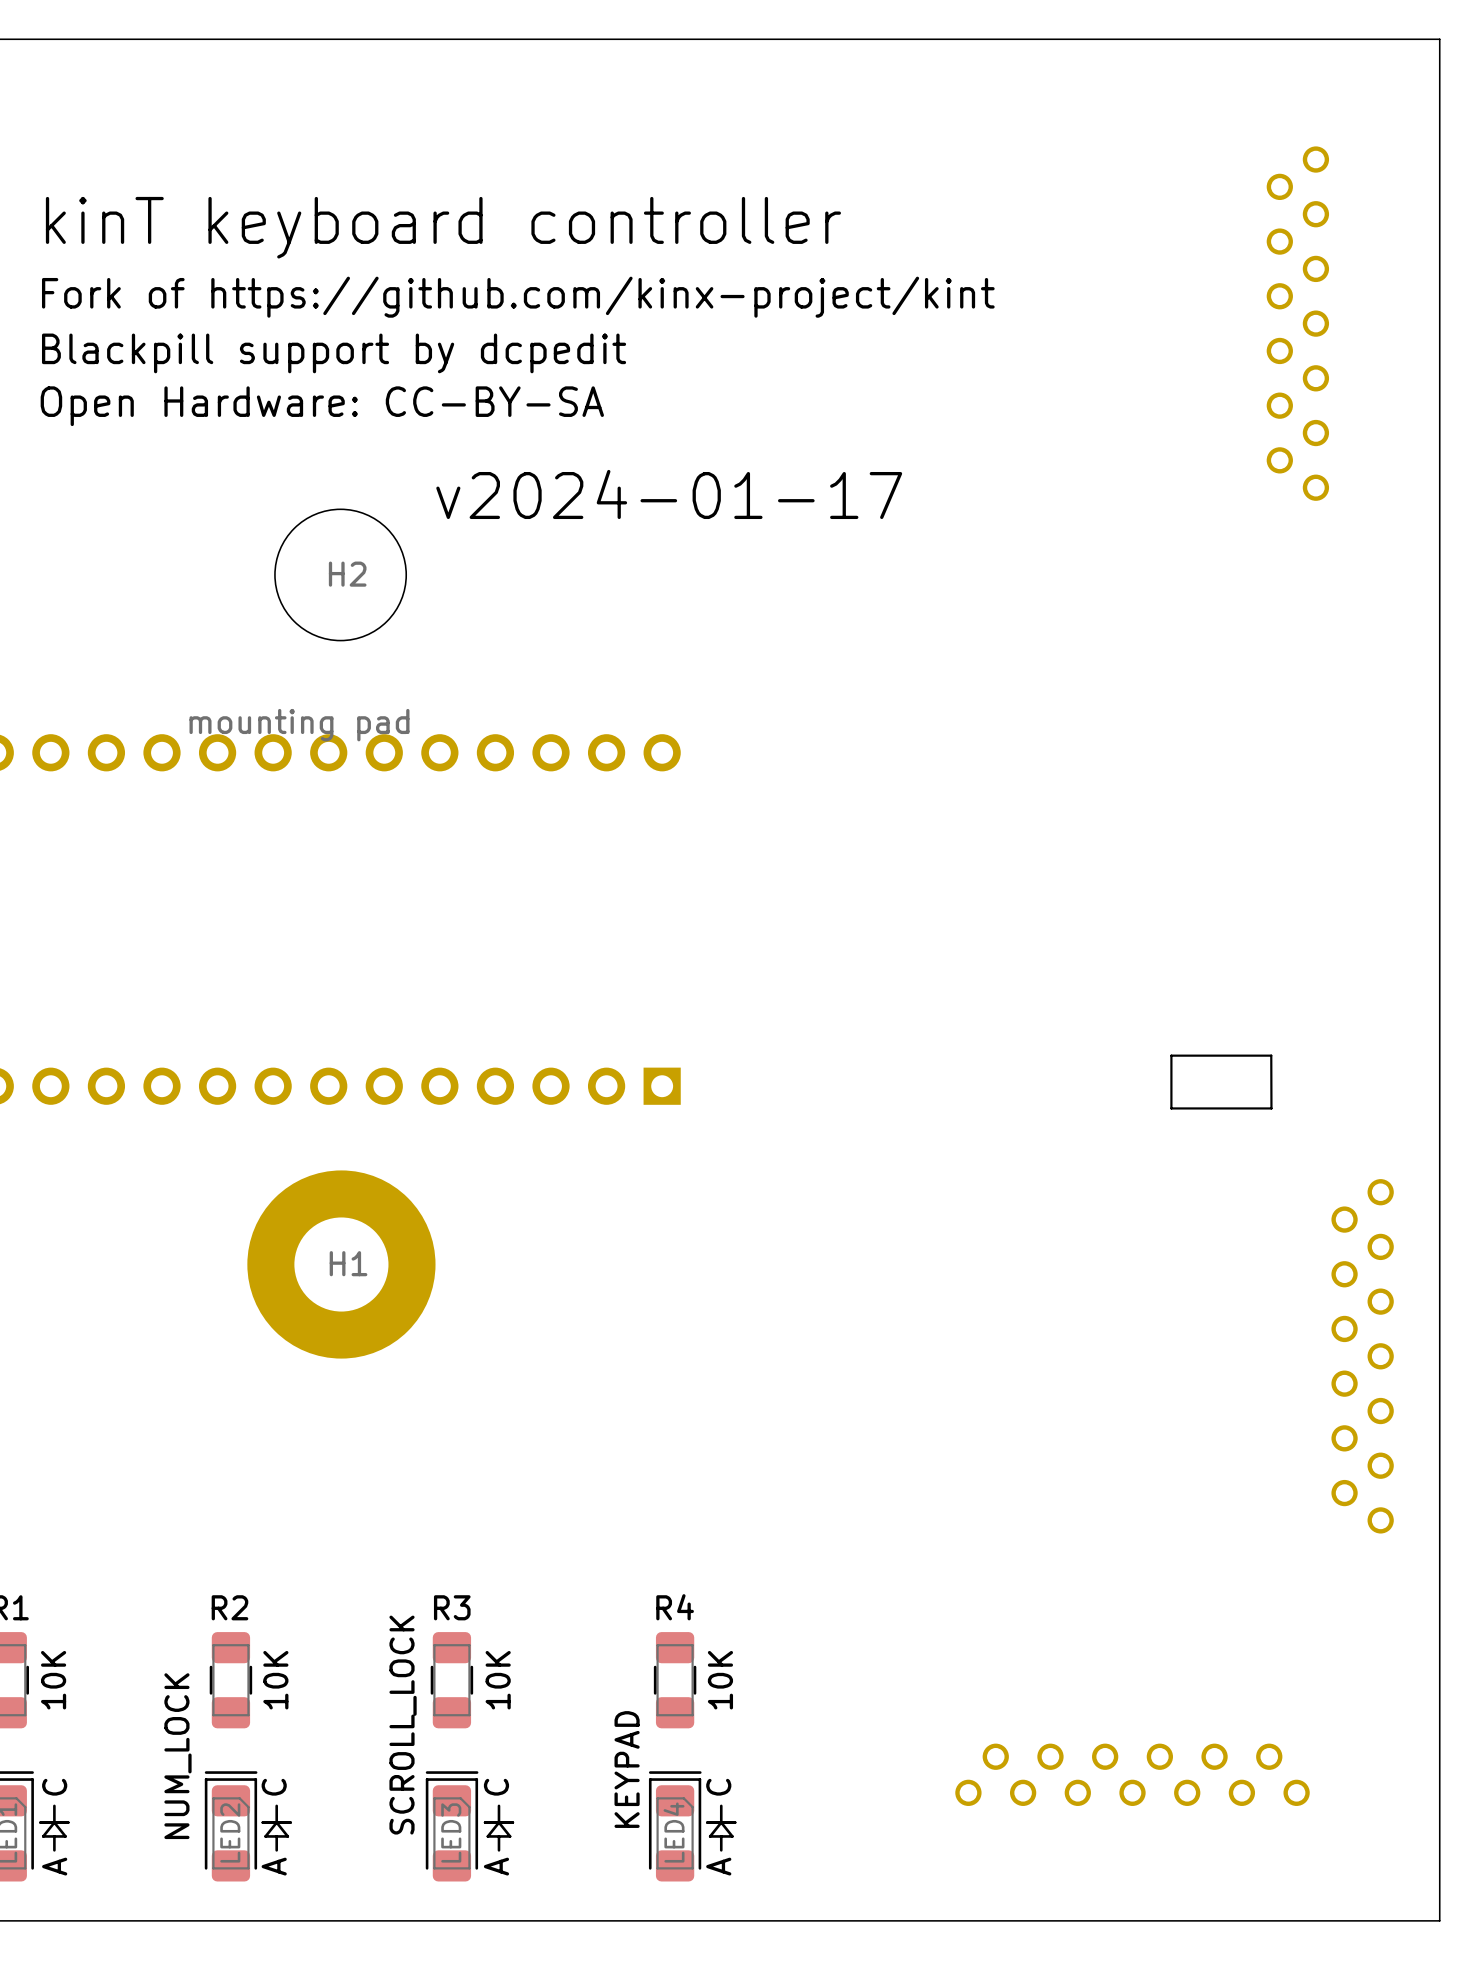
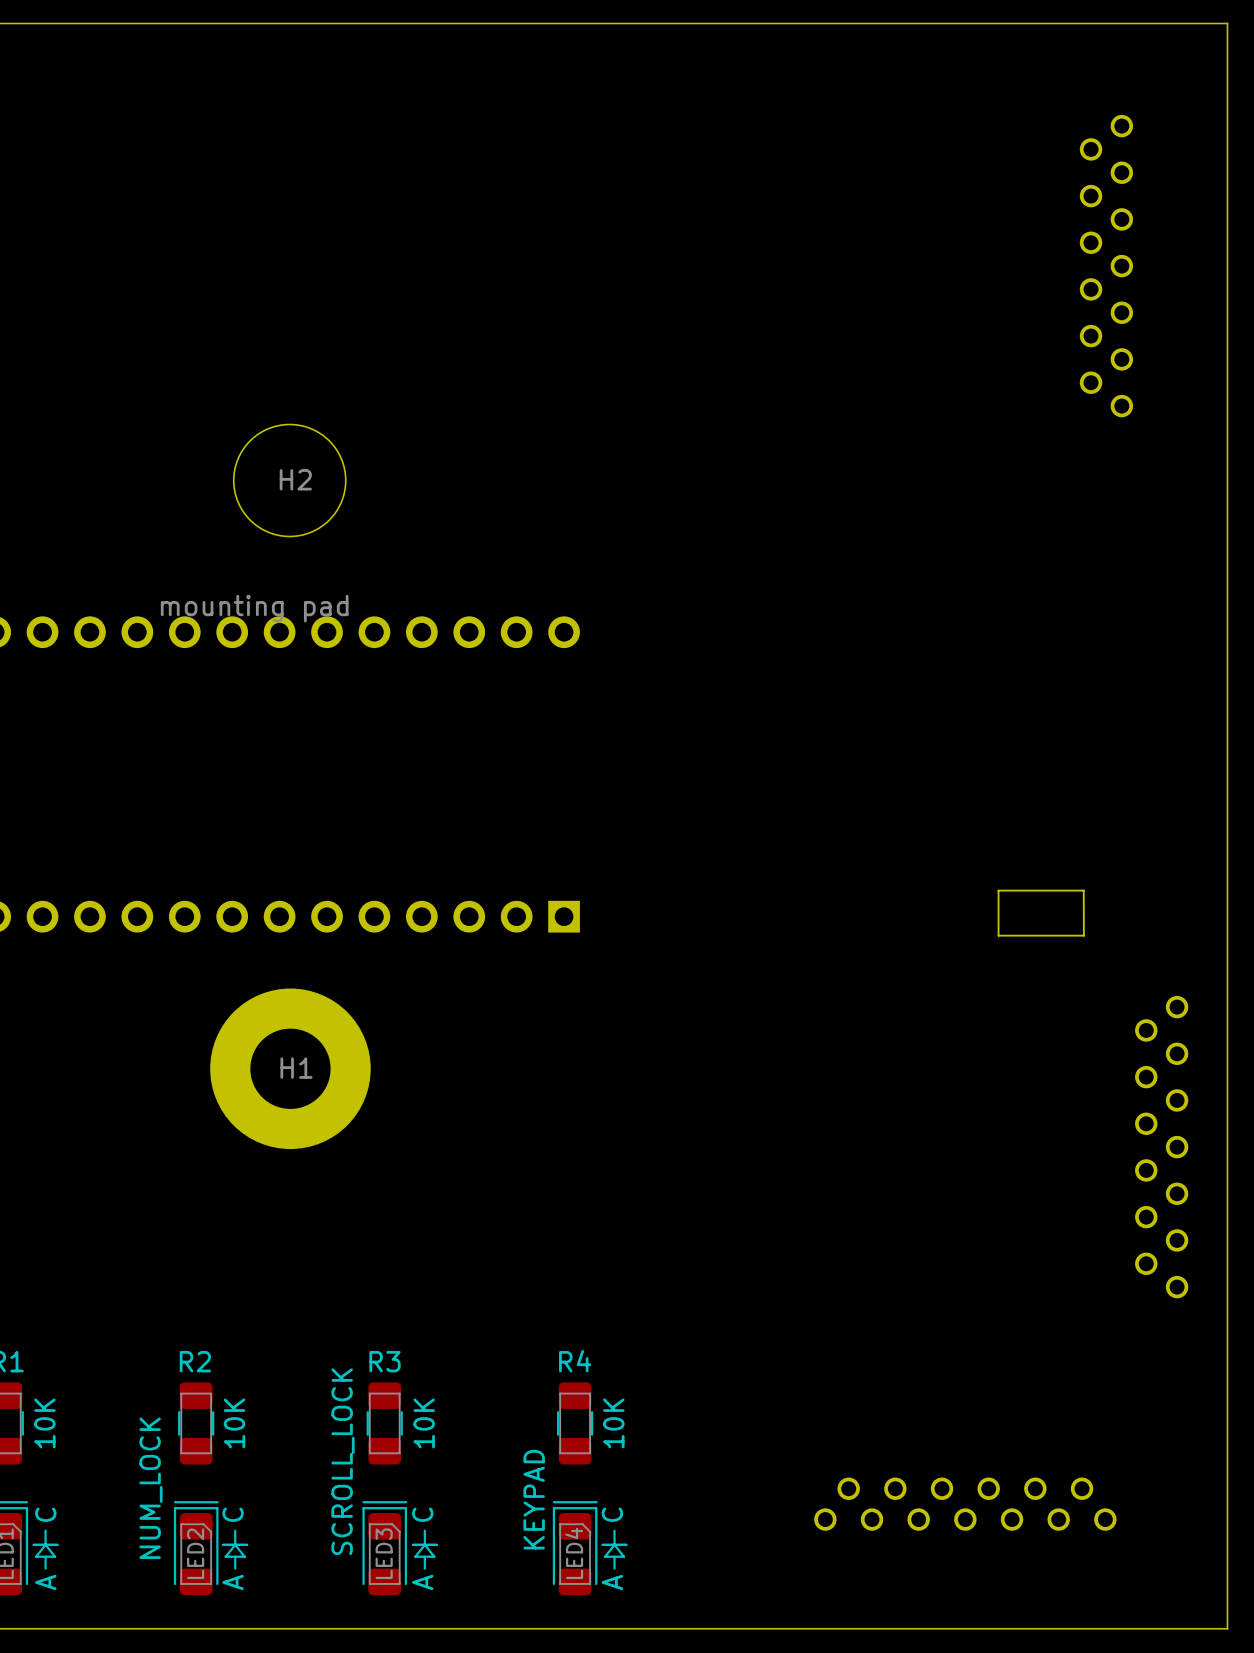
text: kinT keyboard controller (443, 227) -> none
text: Fork of https://github.com/kinx-project/kint (518, 297) -> none
text: Blackpill support by dcpedit (334, 353) -> none
text: Open Hardware: CC-BY-SA (322, 406) -> none
text: v2024-01-17 (669, 494) -> none

